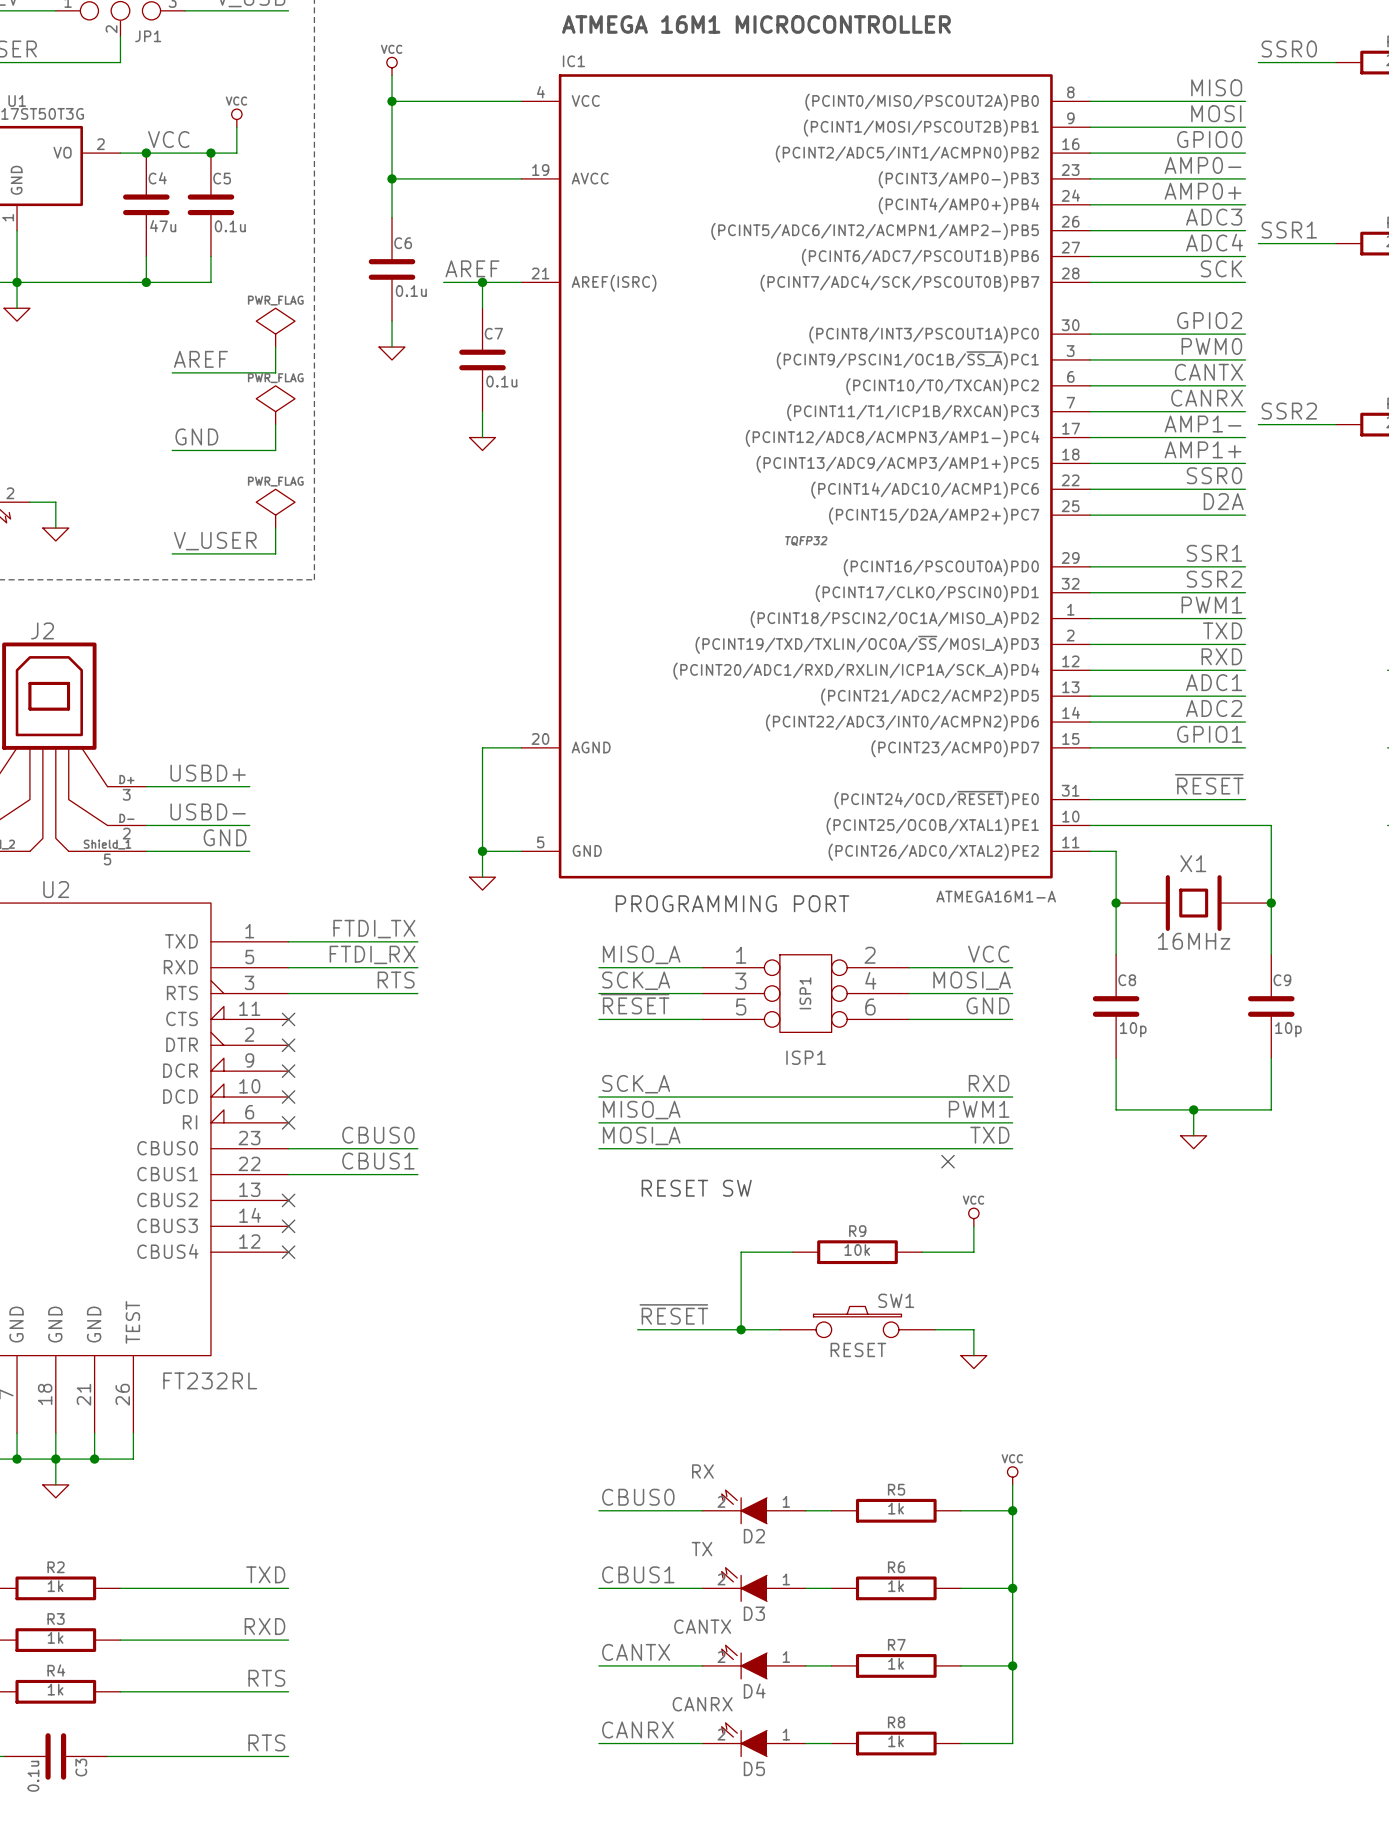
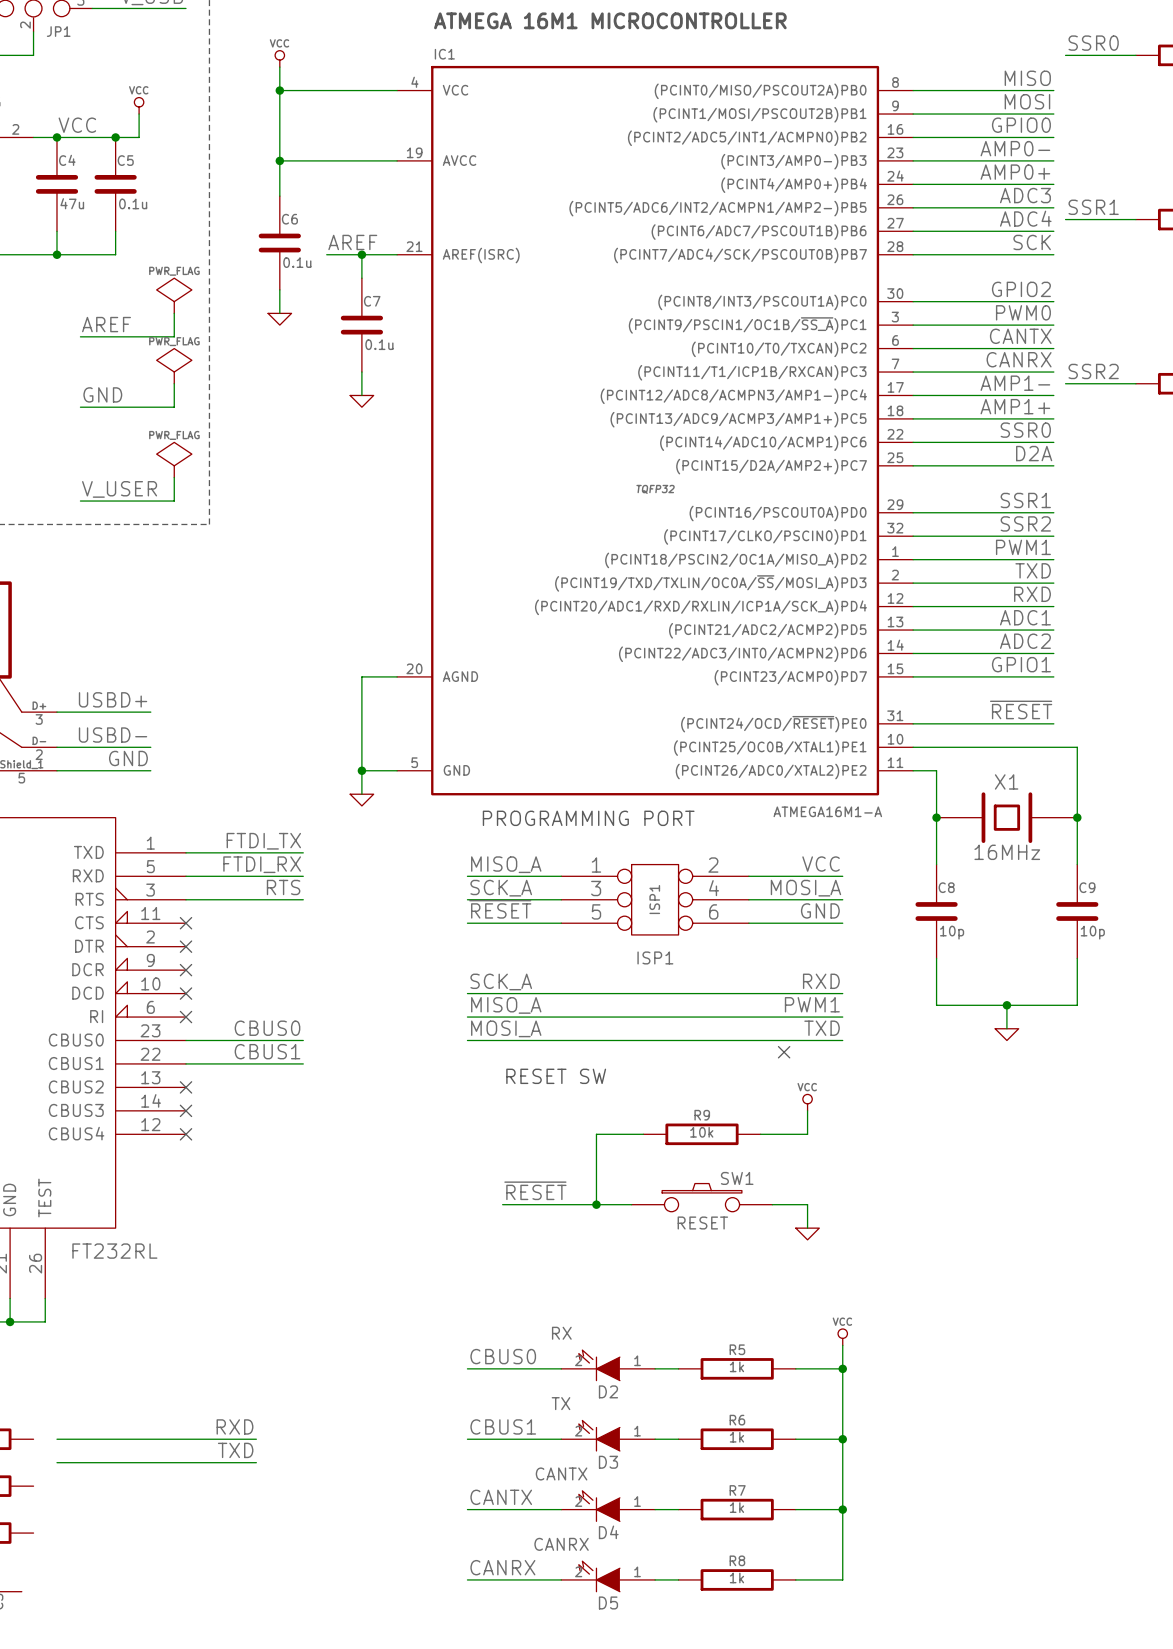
label position: TXD (265, 1574) -> TXD (235, 1450)
wire: (120, 1588) (146, 1588) -> none
wire: none -> (185, 1439) (256, 1439)
wire: none -> (56, 1462) (256, 1462)
label position: RXD (265, 1626) -> RXD (234, 1426)
wire: (120, 1640) (288, 1640) -> none
label: RTS (266, 1678) -> none
wire: (120, 1691) (288, 1691) -> none
label: RTS (266, 1742) -> none
wire: (107, 1756) (288, 1756) -> none

